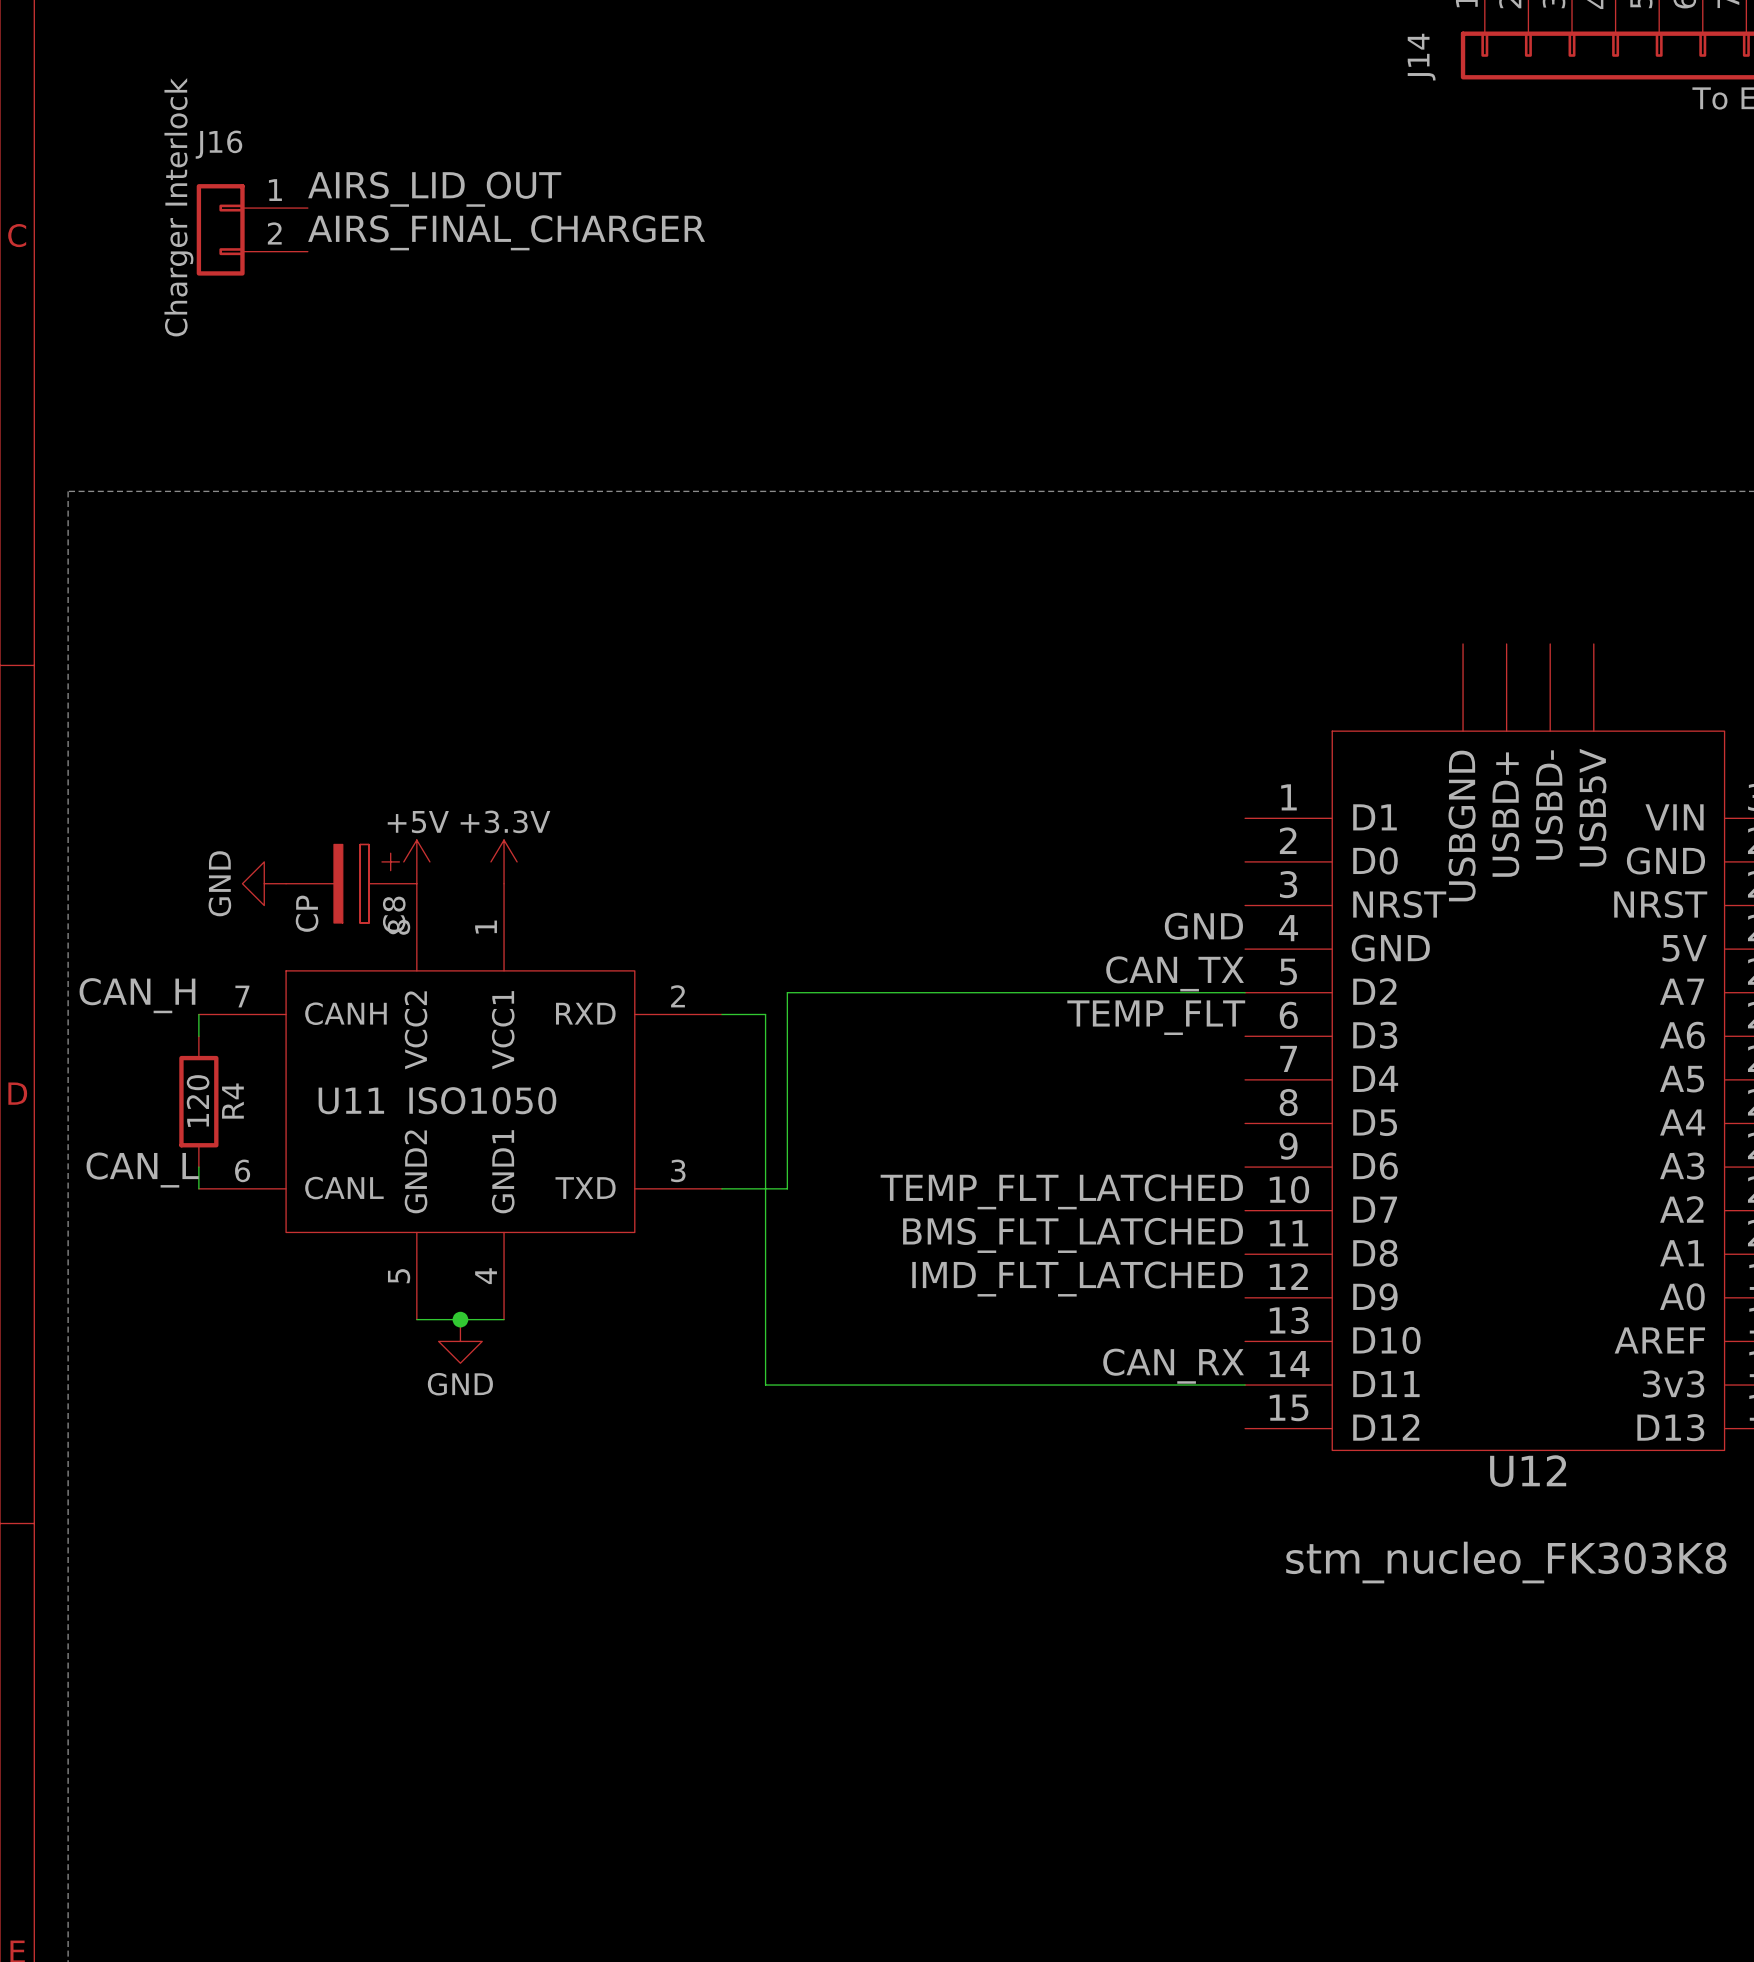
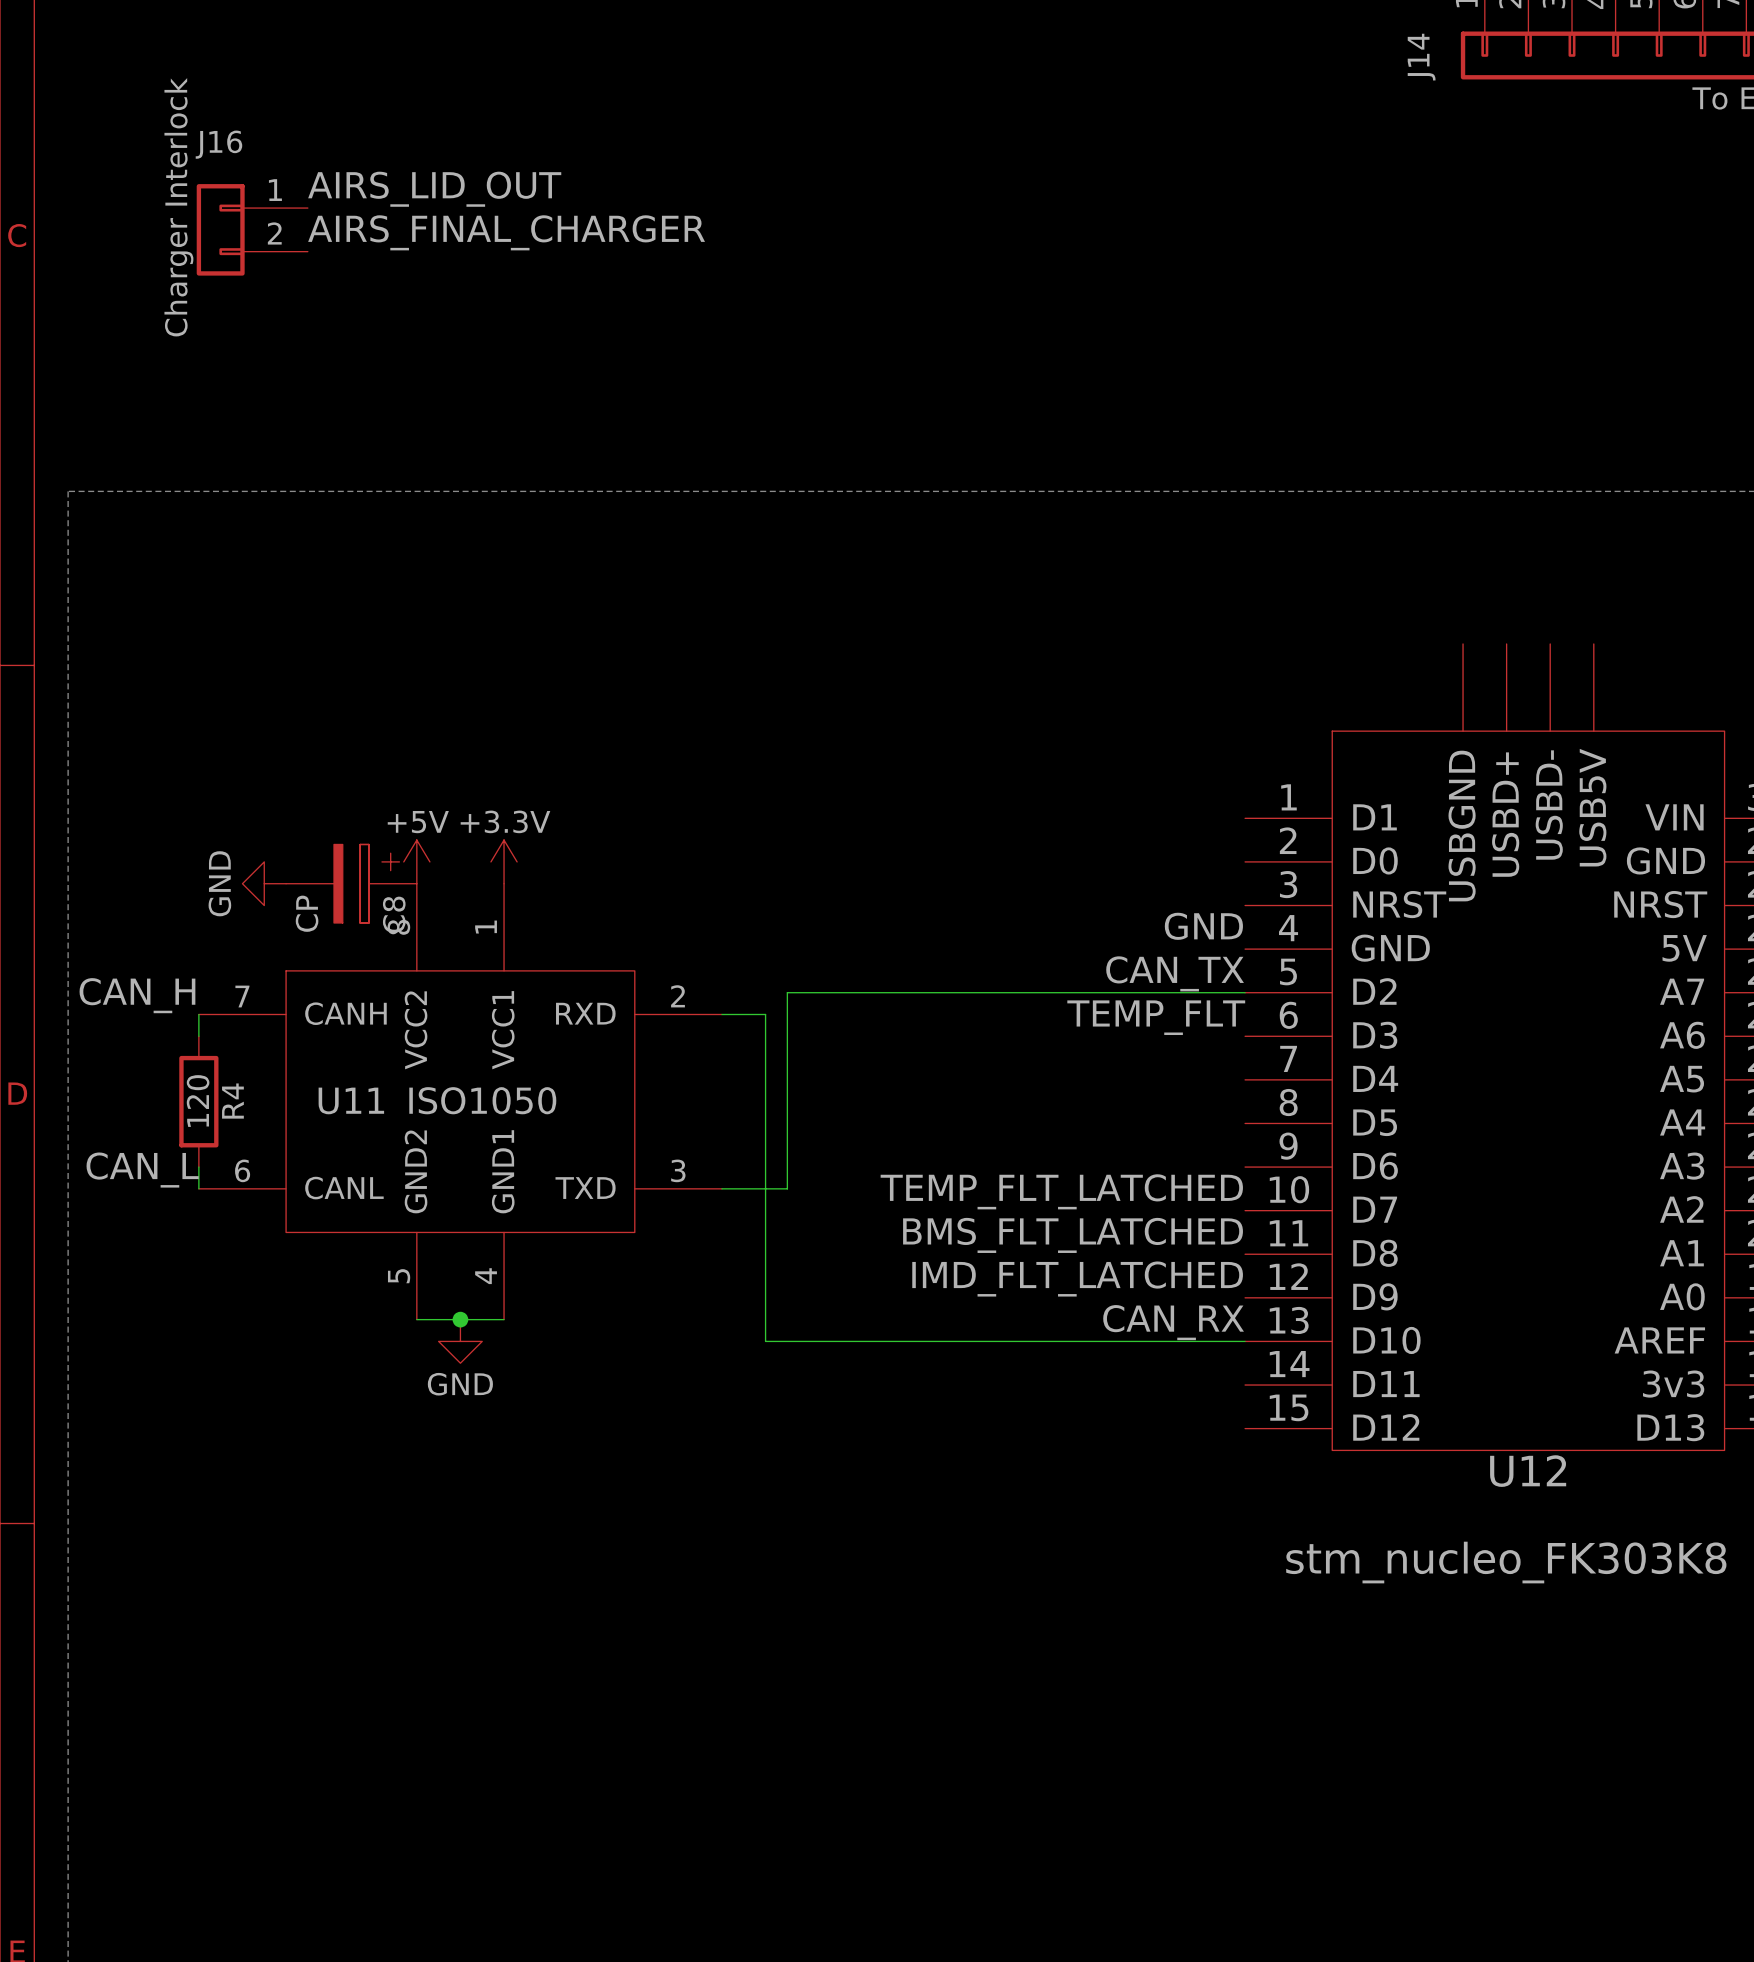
wire: (765, 1341) (765, 1385) (1245, 1385) -> (765, 1341) (1245, 1341)
label position: CAN_RX (1173, 1366) -> CAN_RX (1173, 1322)

